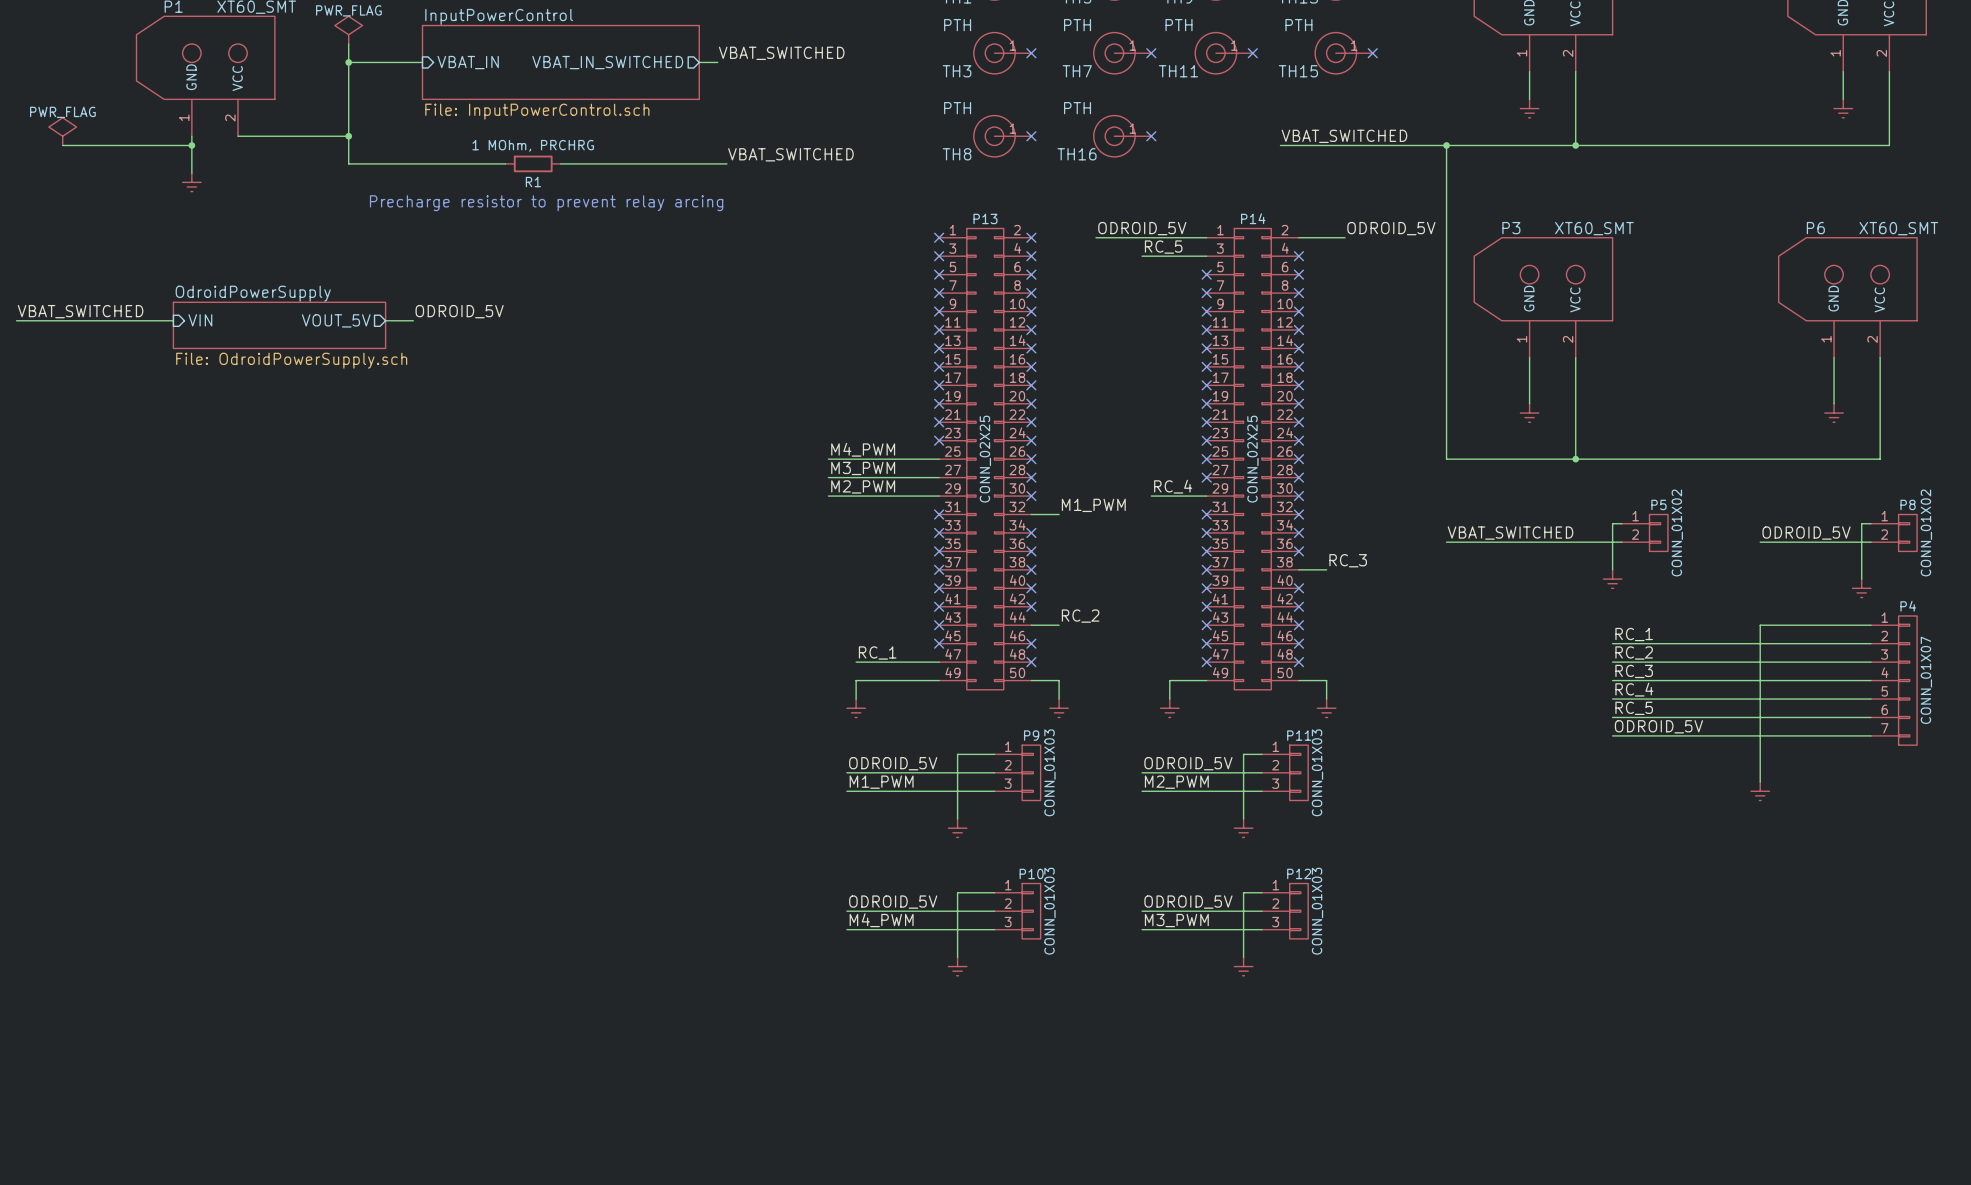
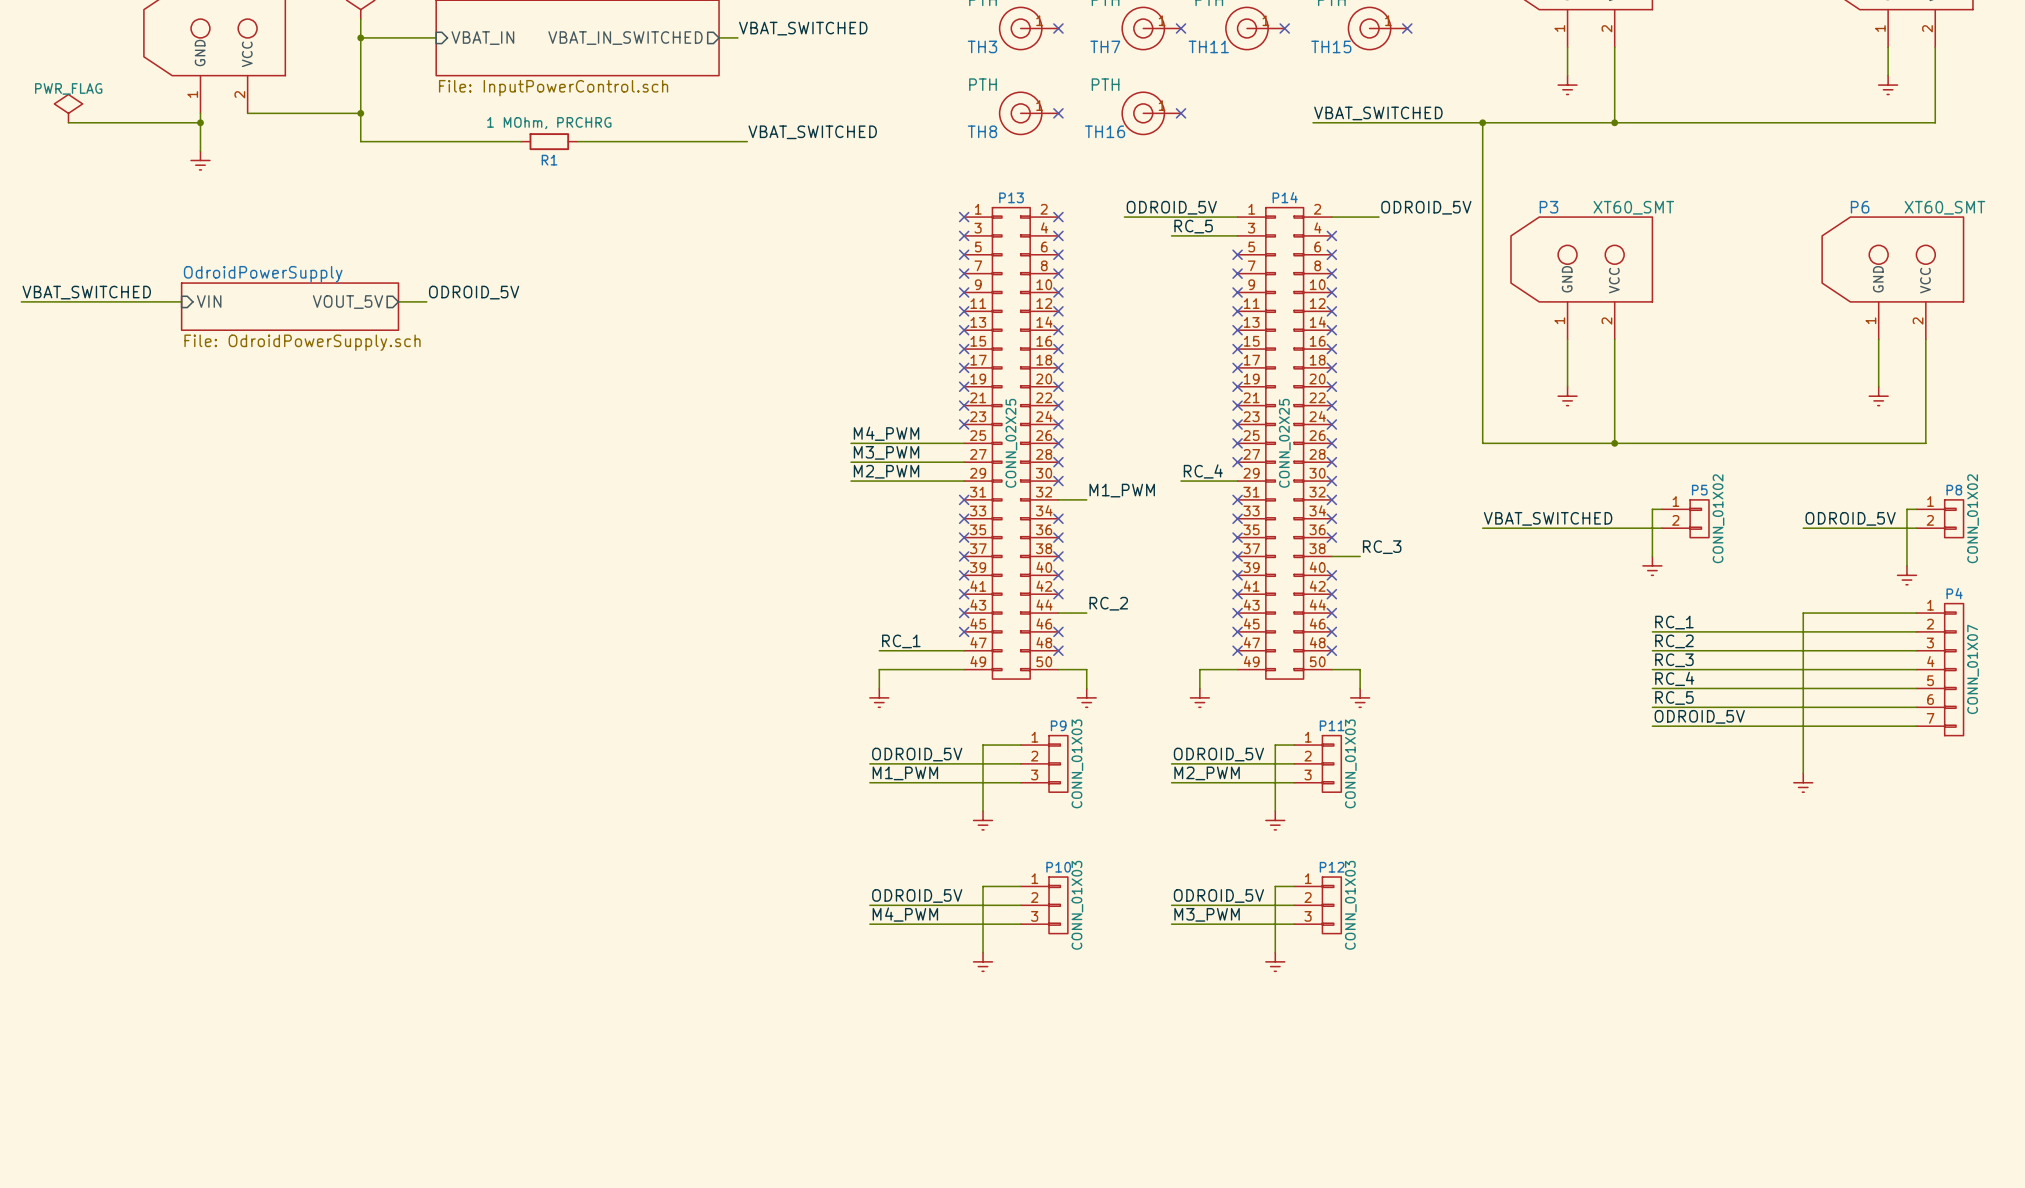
text: Precharge resistor to prevent relay arcing (546, 203) -> none

